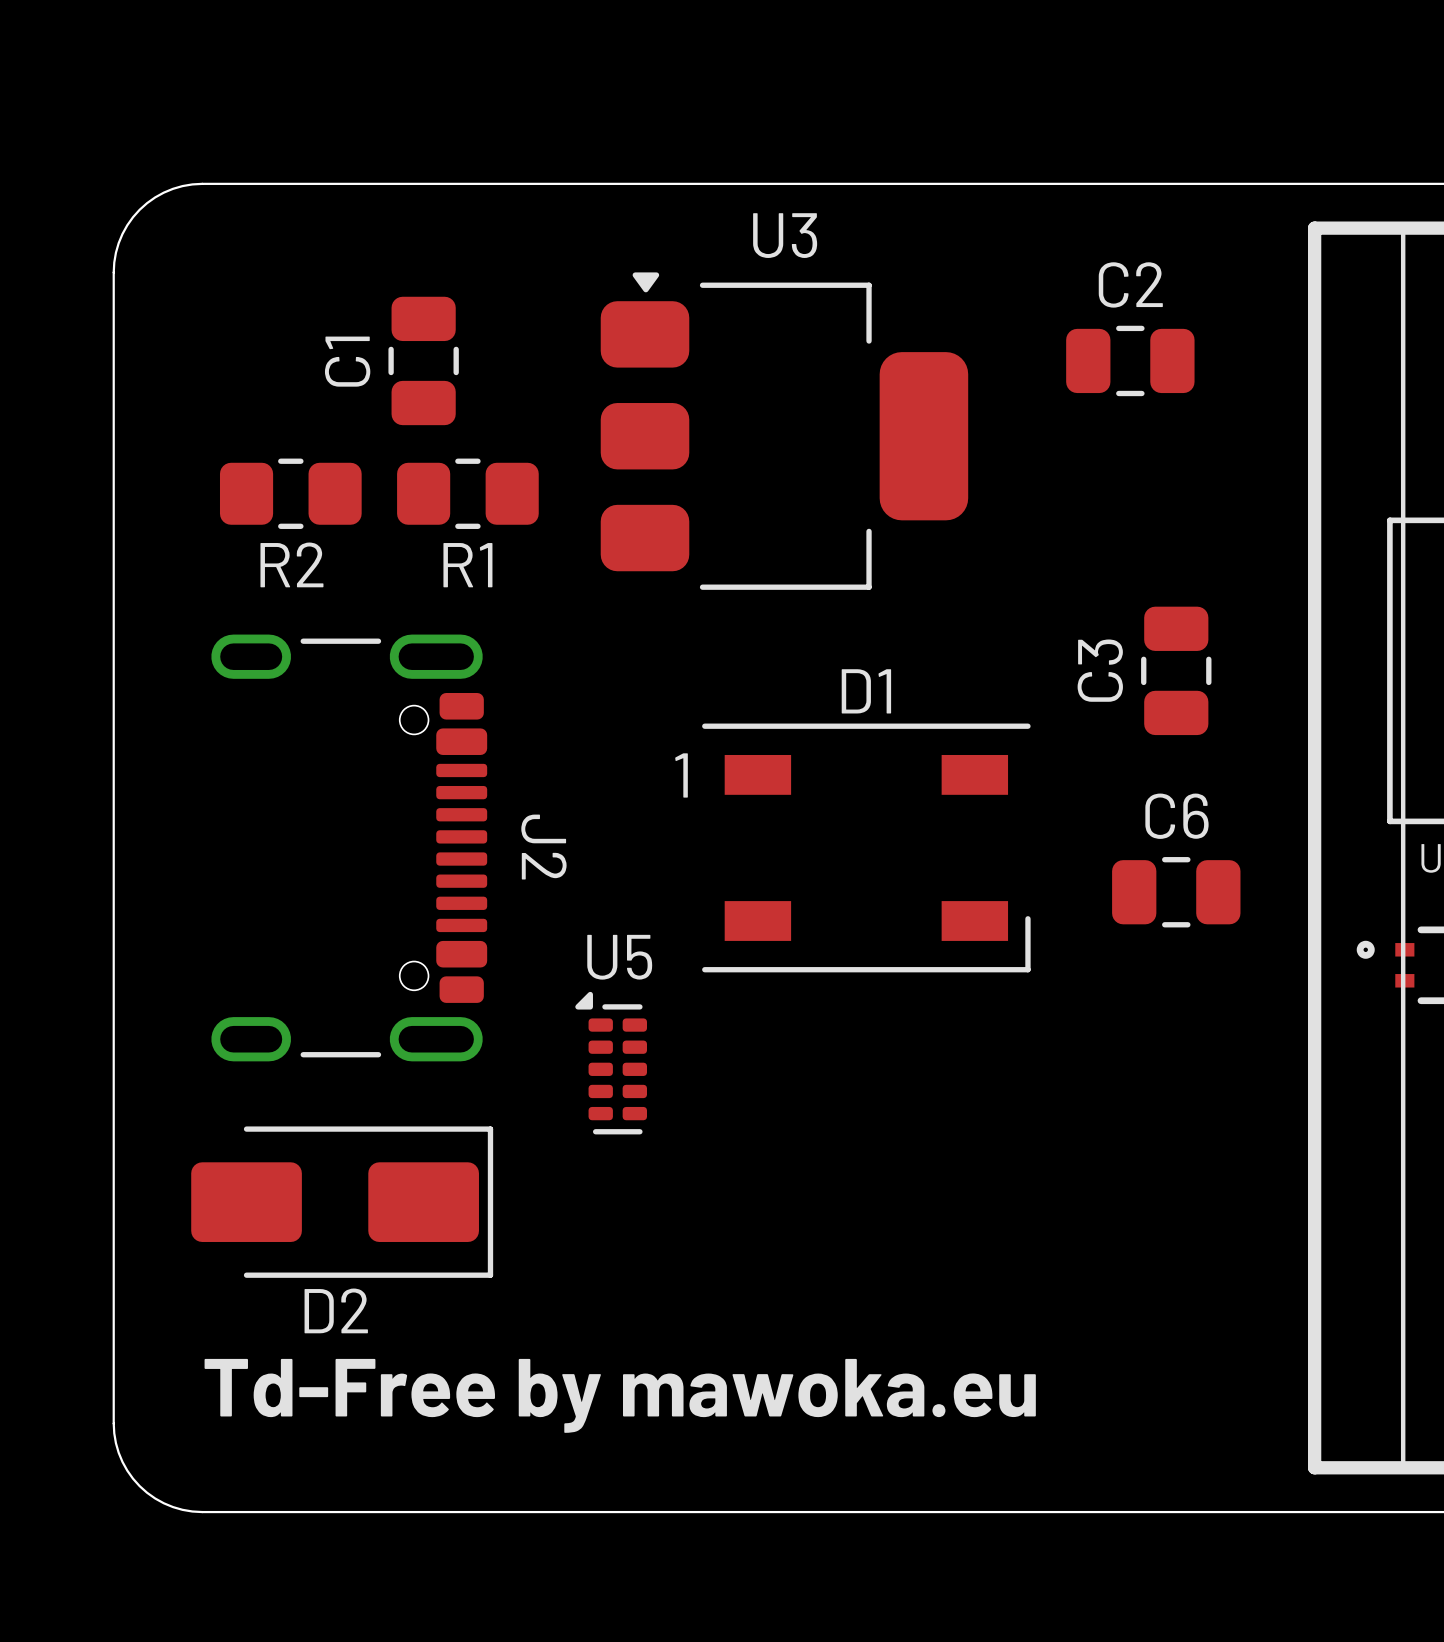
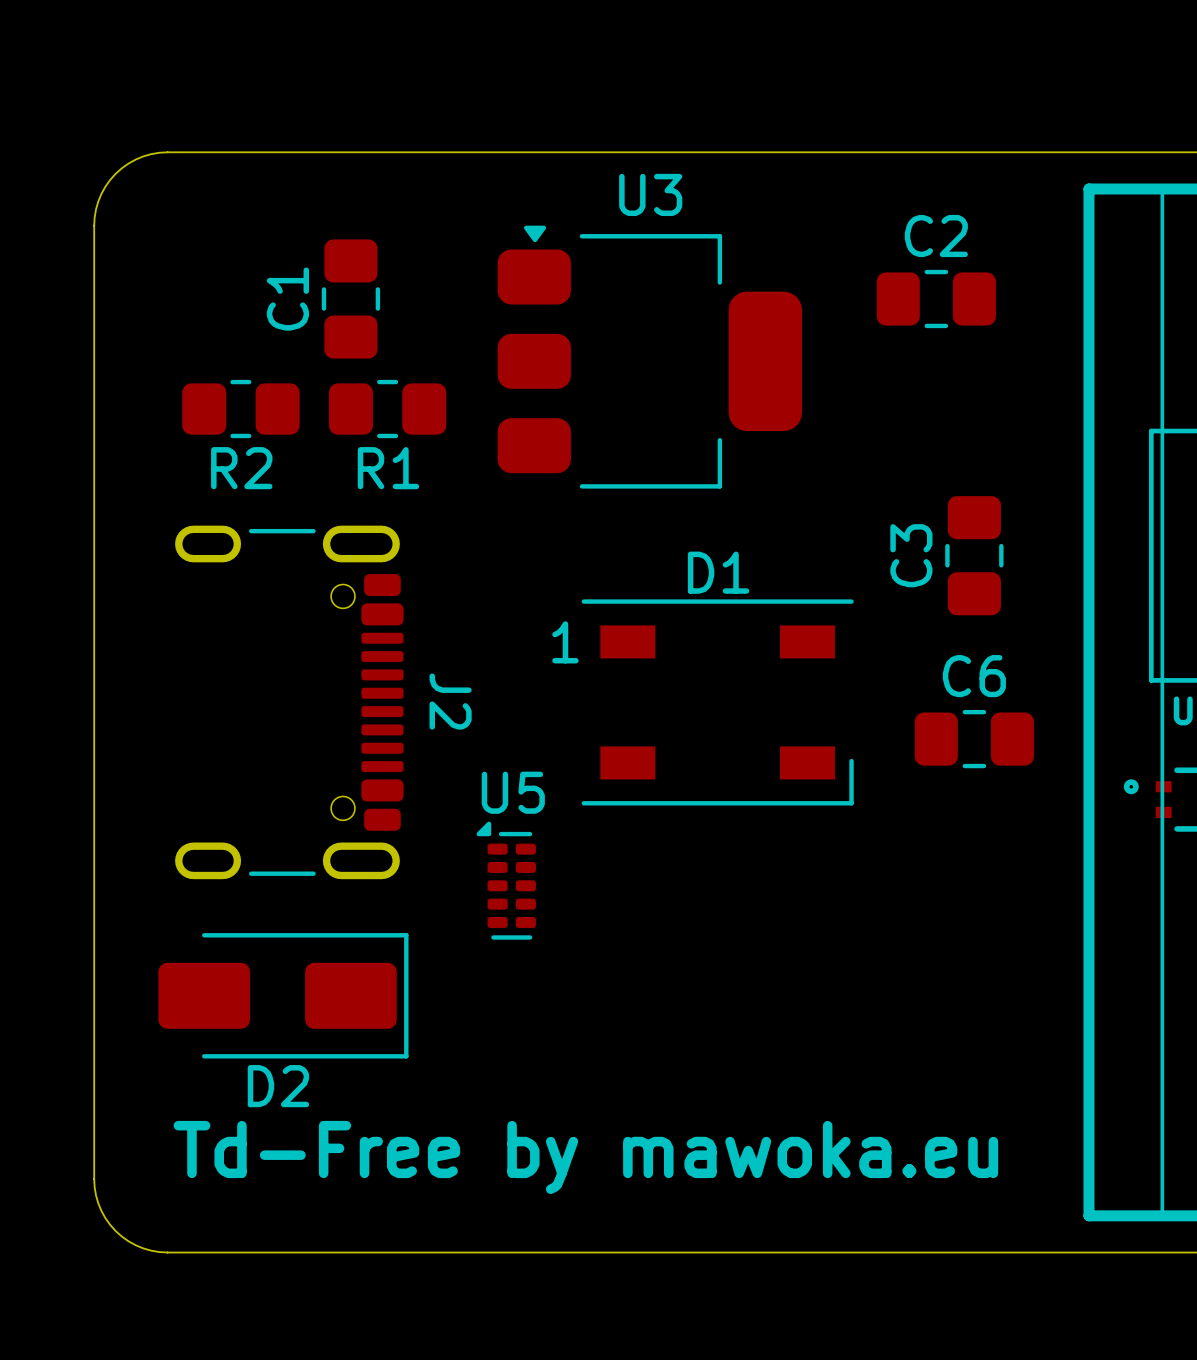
C1 footprint: [388, 296, 459, 426] -> [321, 239, 381, 359]
C2 footprint: [1066, 325, 1195, 397] -> [876, 269, 996, 329]
C3 footprint: [1141, 606, 1212, 736] -> [945, 496, 1004, 616]
C6 footprint: [1112, 857, 1241, 928] -> [914, 709, 1034, 769]

